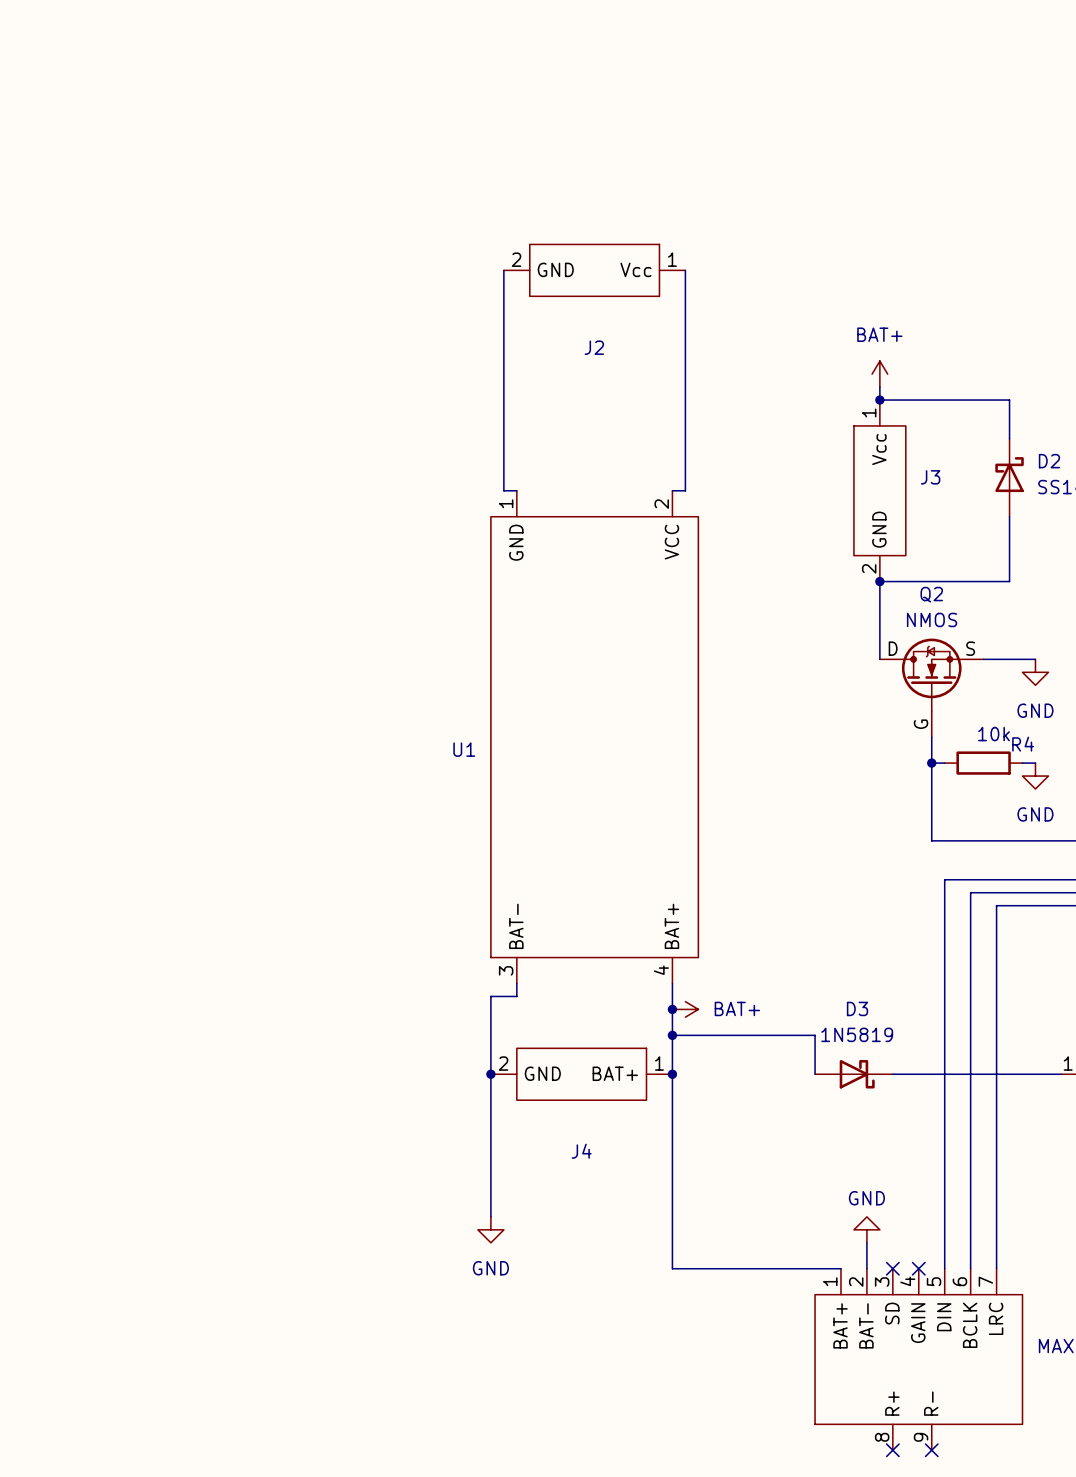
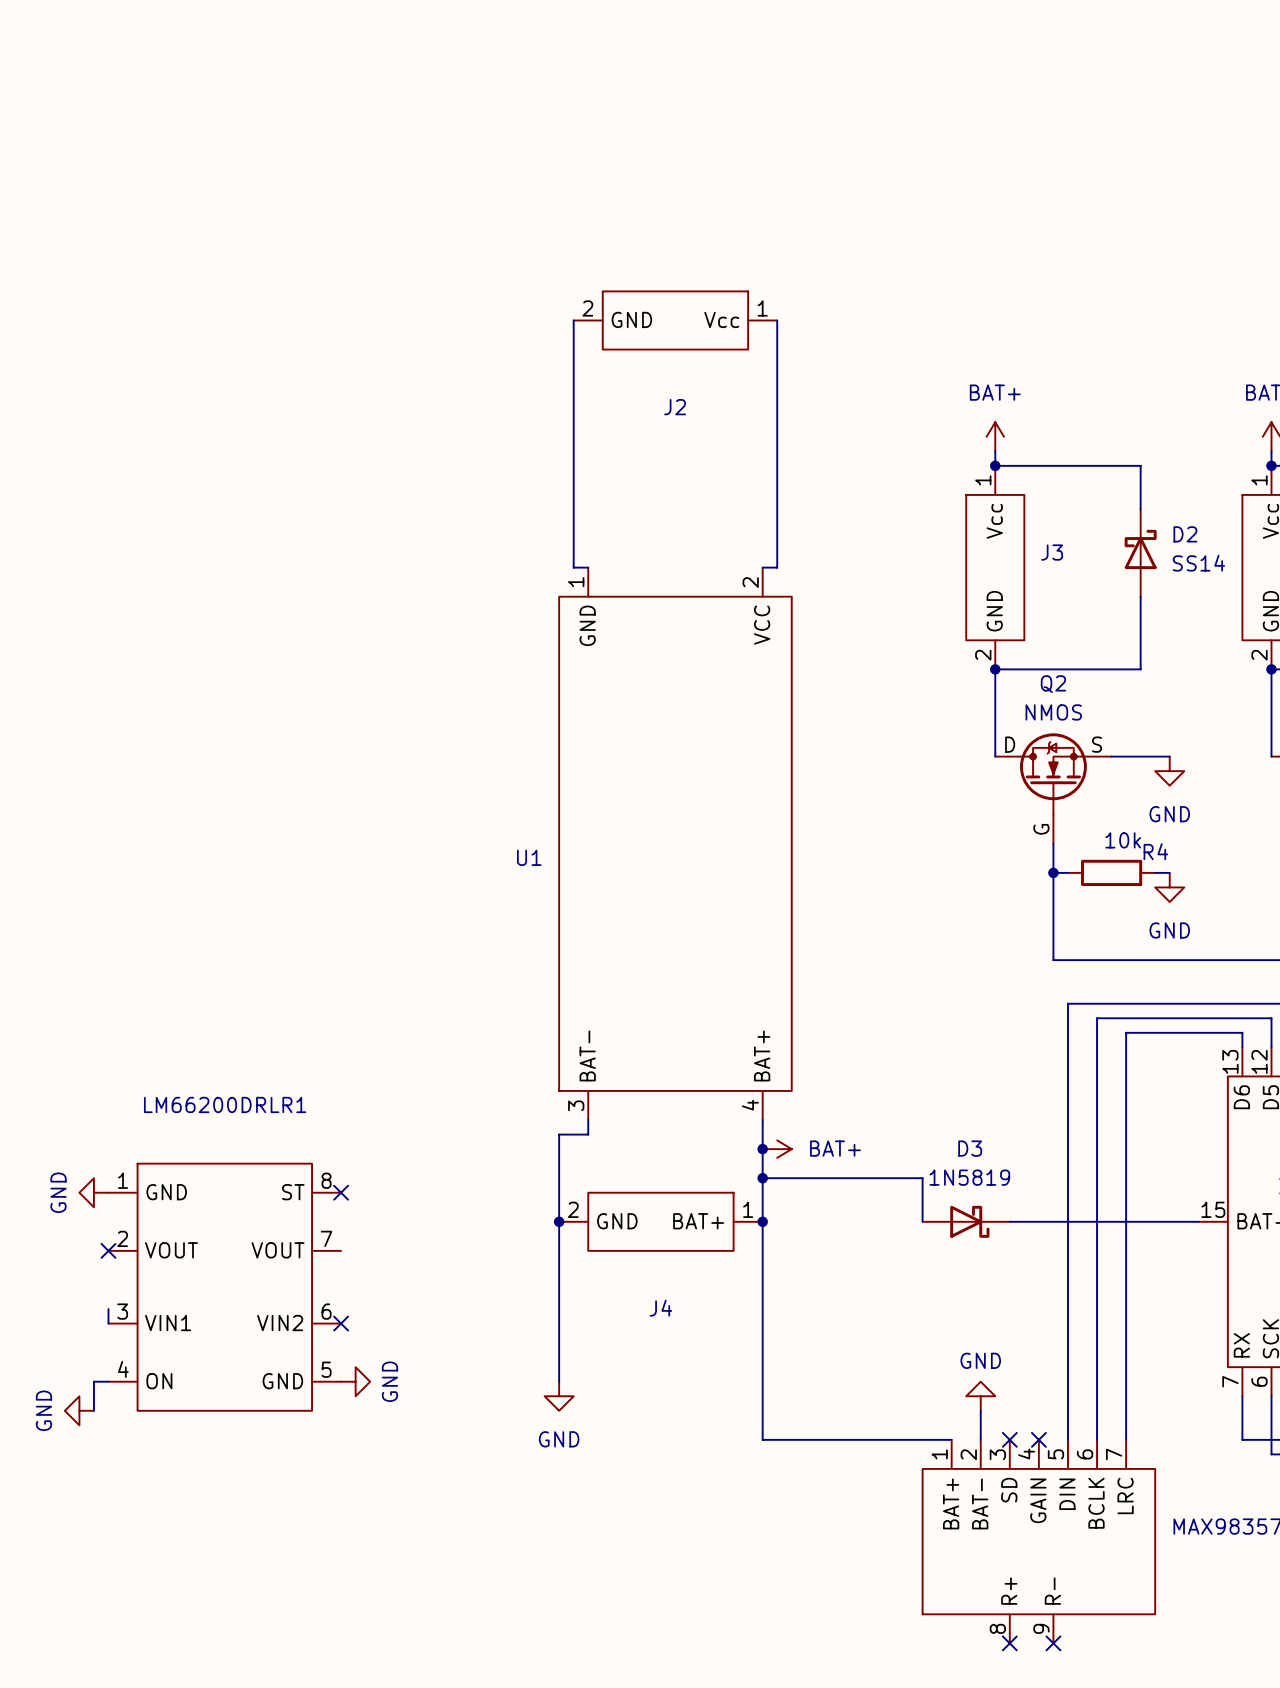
power symbol: none -> GND (93, 1192)
no-connect mark: none -> (341, 1192)
no-connect mark: none -> (108, 1250)
LM66200DRLR1: none -> (224, 1287)
wire: none -> (108, 1309) (108, 1323)
no-connect mark: none -> (341, 1323)
wire: none -> (108, 1381) (93, 1381) (93, 1410)
power symbol: none -> GND (355, 1381)
power symbol: none -> GND (79, 1410)

